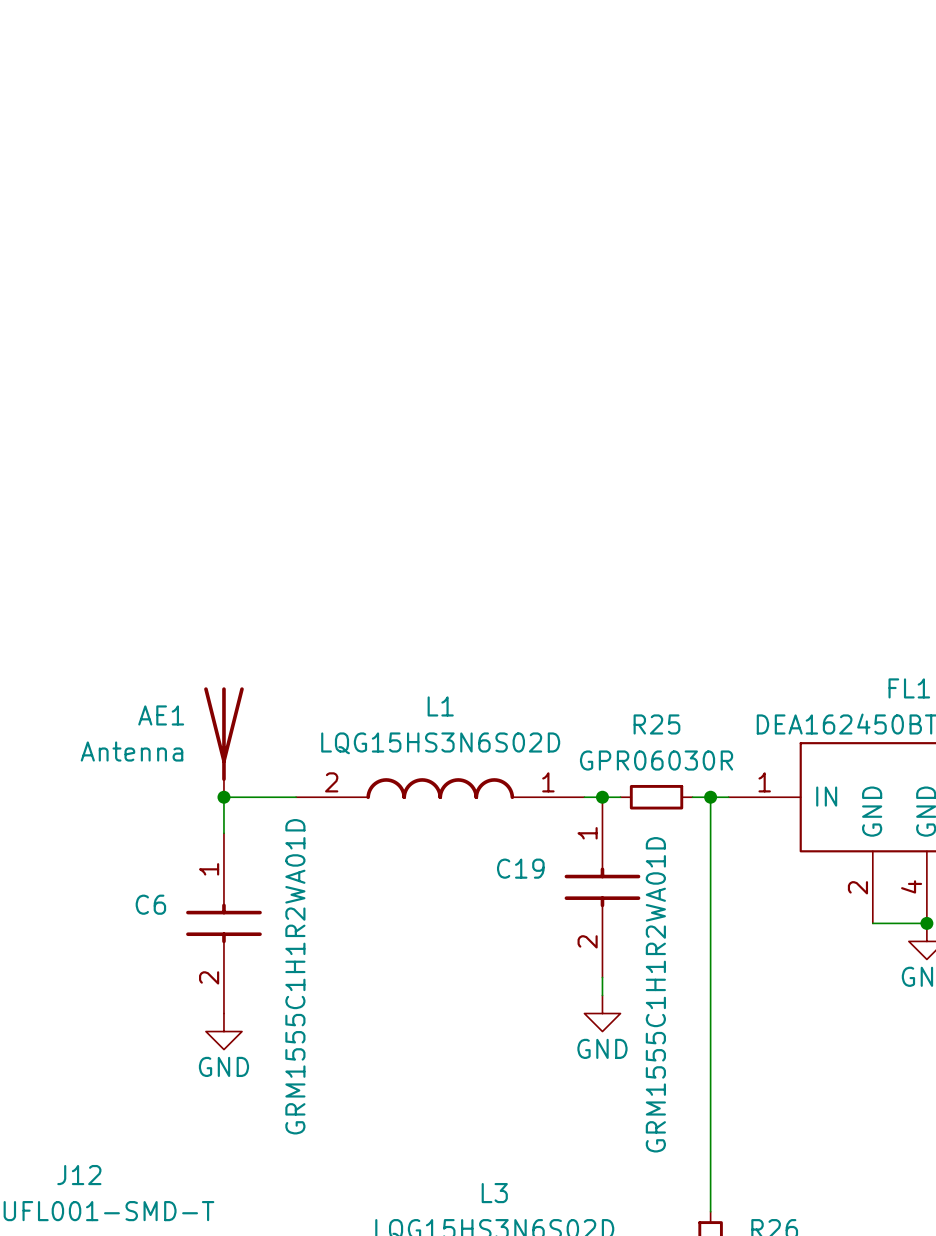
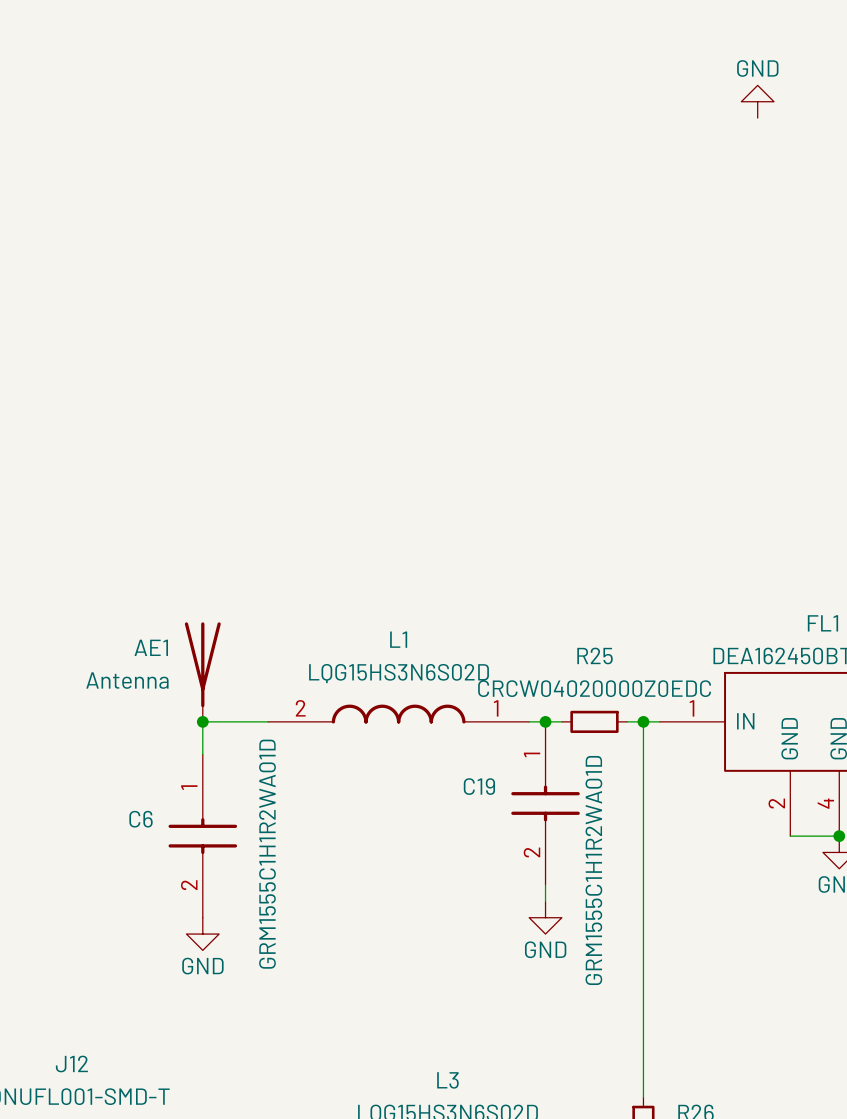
power symbol: none -> GND (757, 101)
R25 value: GPR06030R (656, 760) -> CRCW04020000Z0EDC (594, 688)

